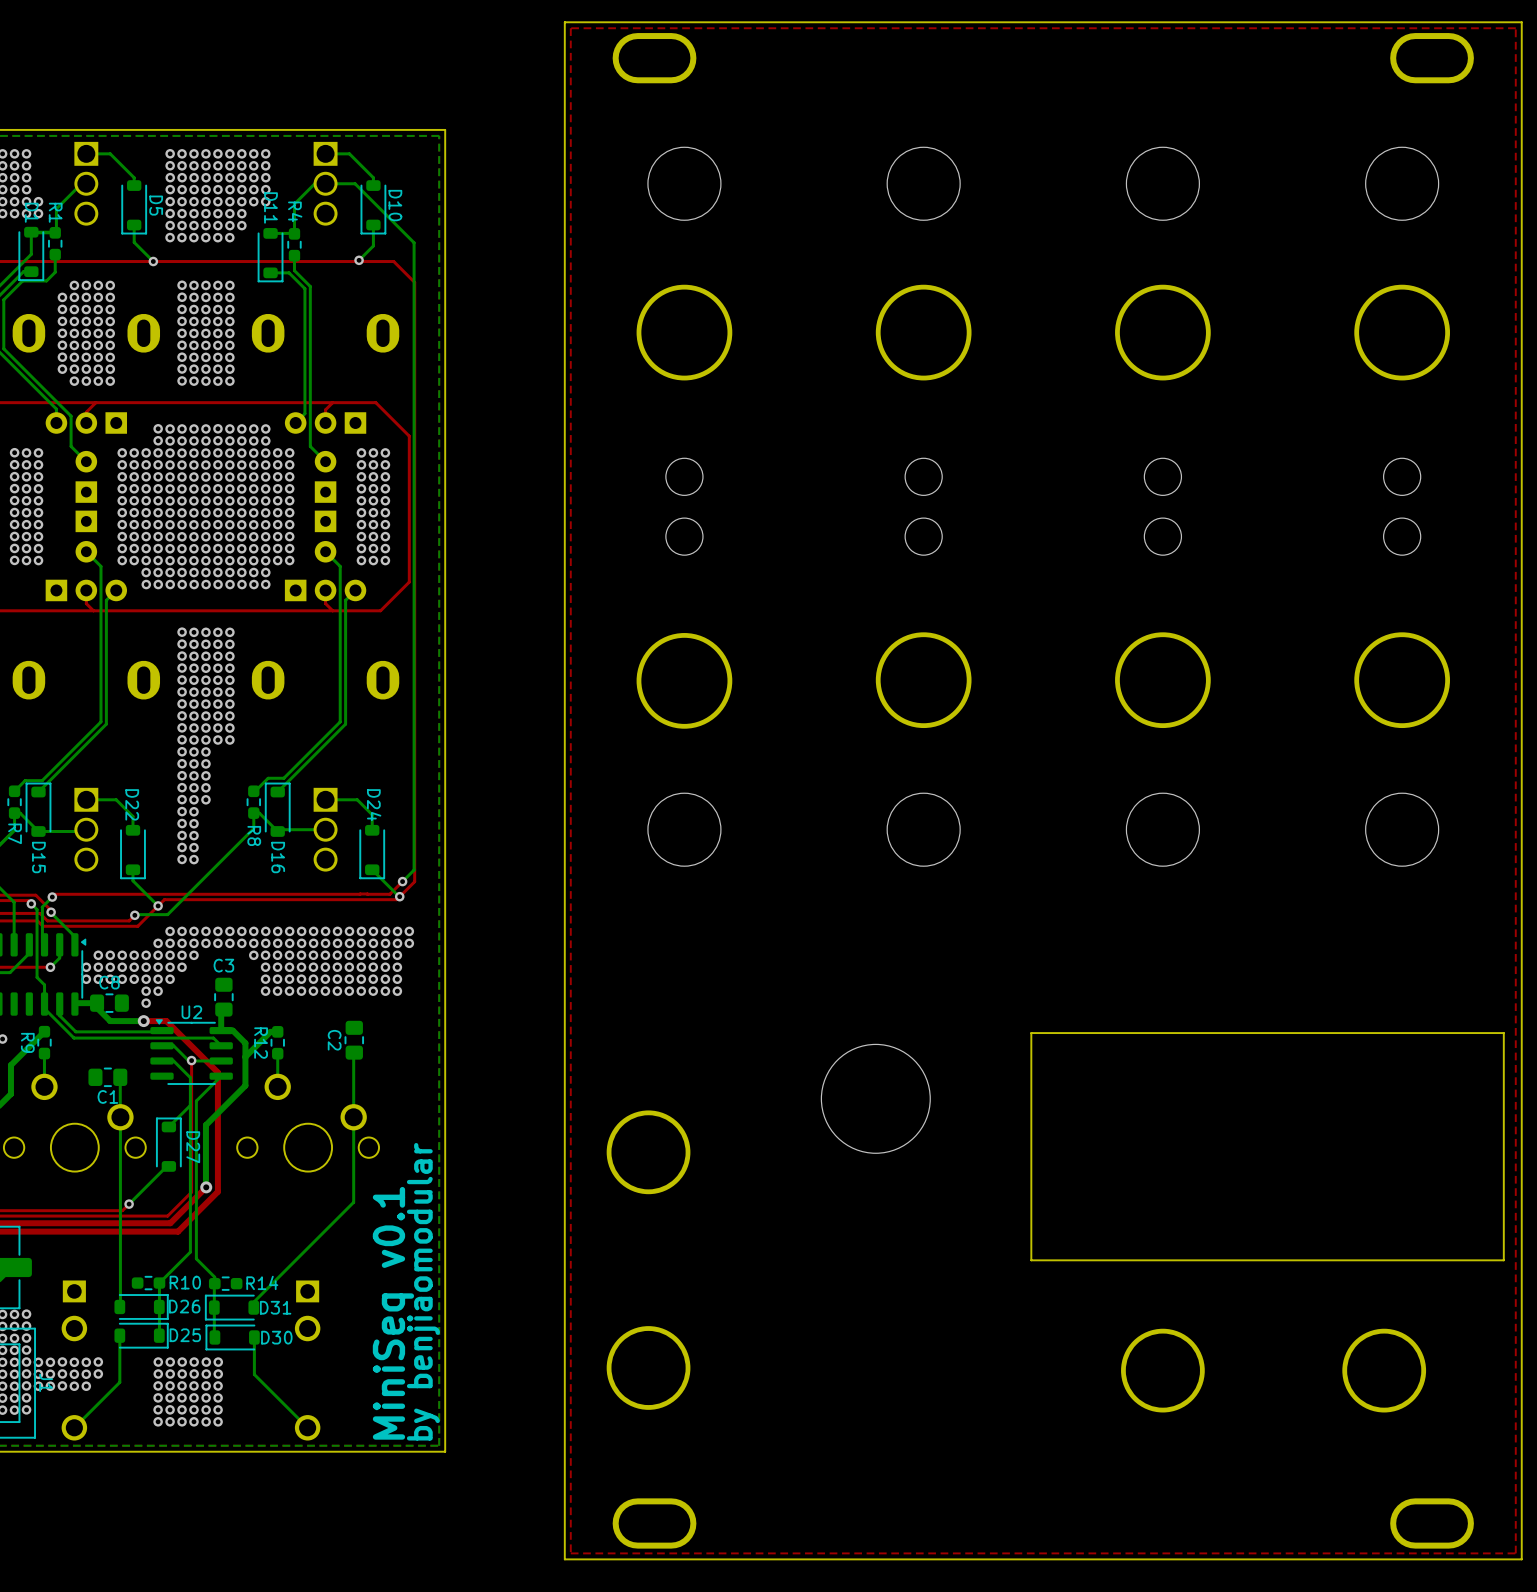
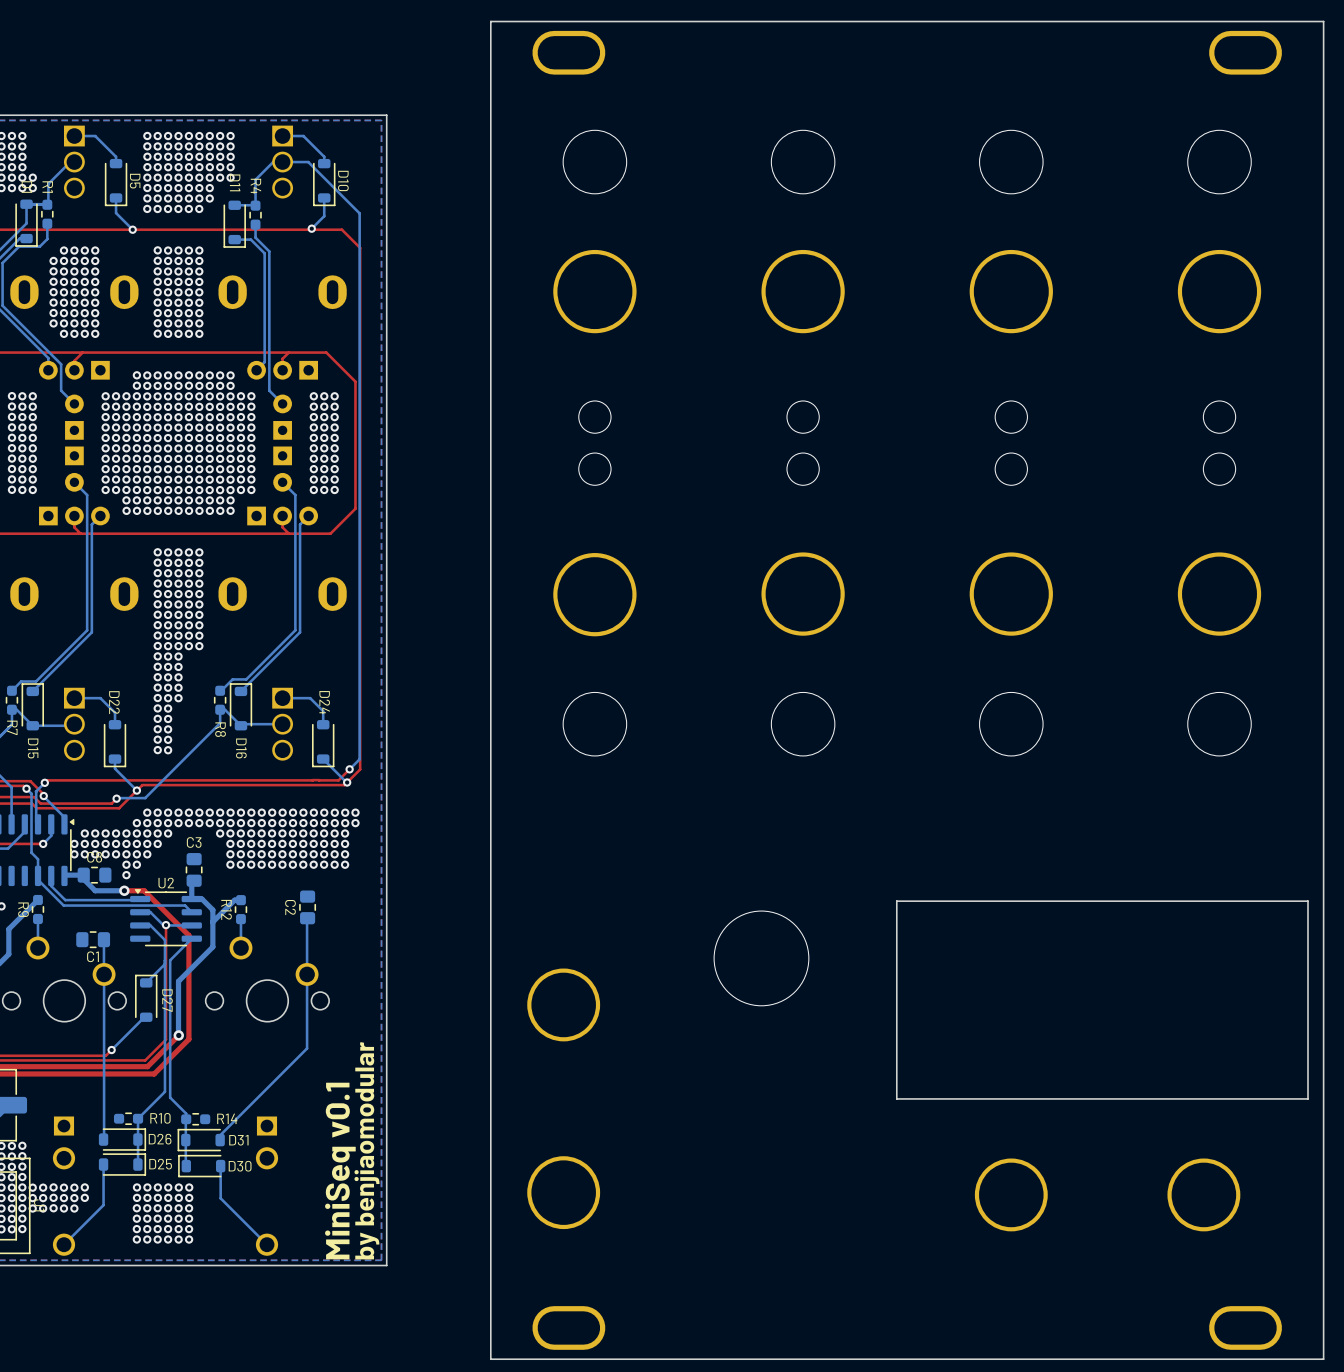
top zone outline: (1515, 28) (570, 28) (570, 1553) (1515, 1553) (1515, 28) -> none

